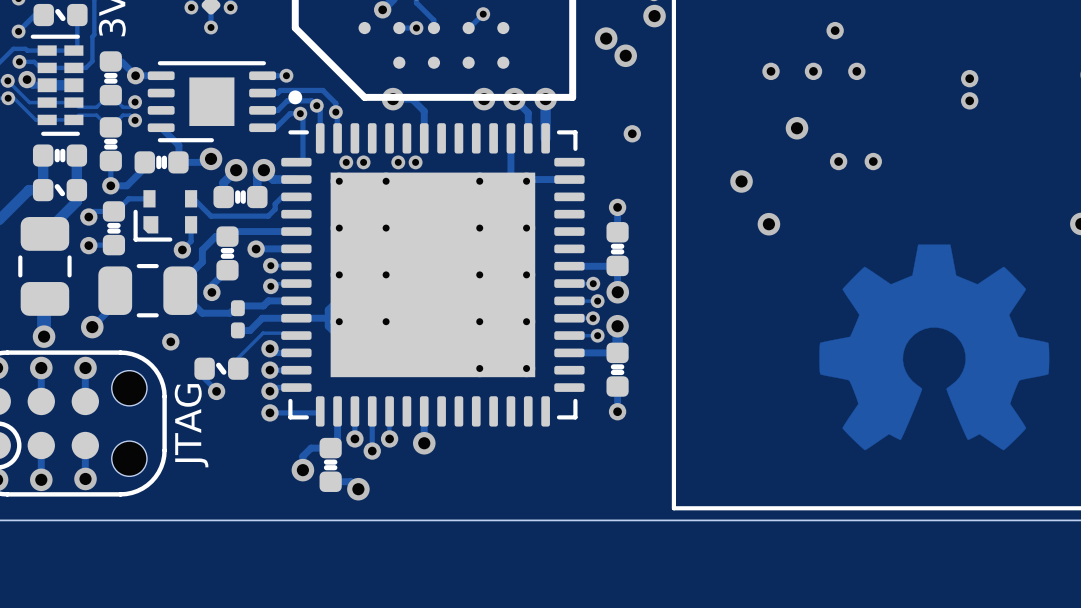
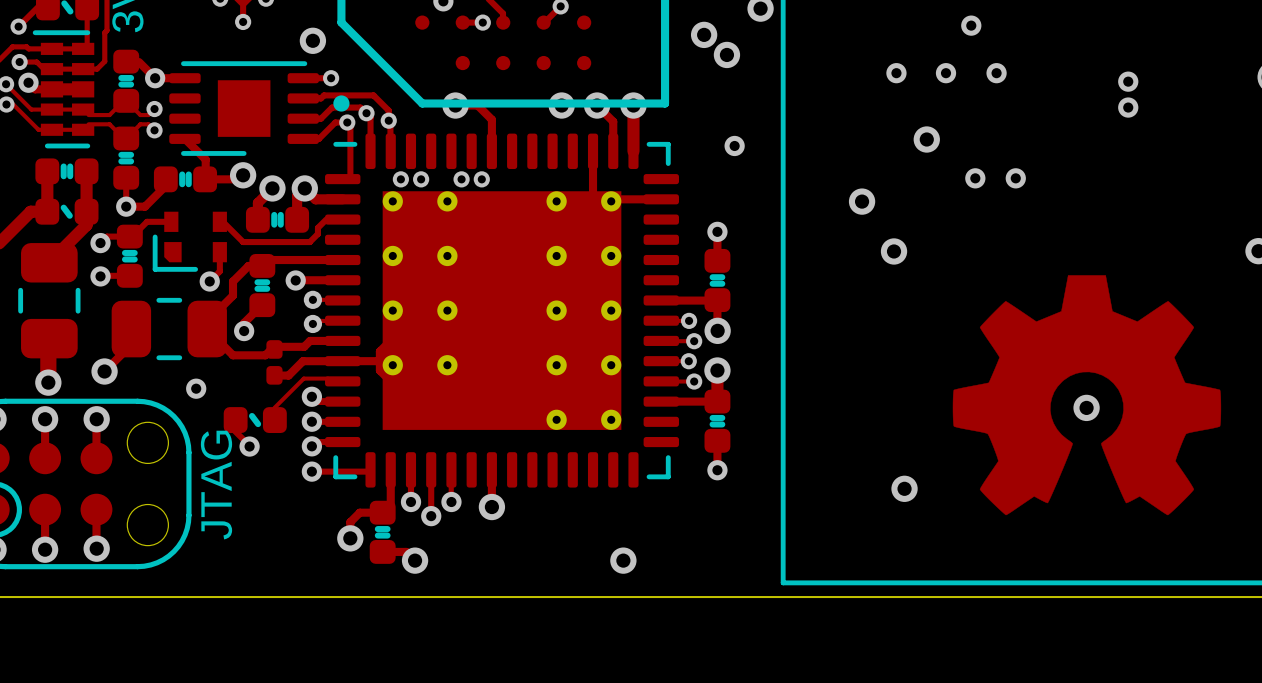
via: none -> (312, 40)
via: none -> (1086, 407)
via: none -> (904, 488)
via: none -> (623, 560)

